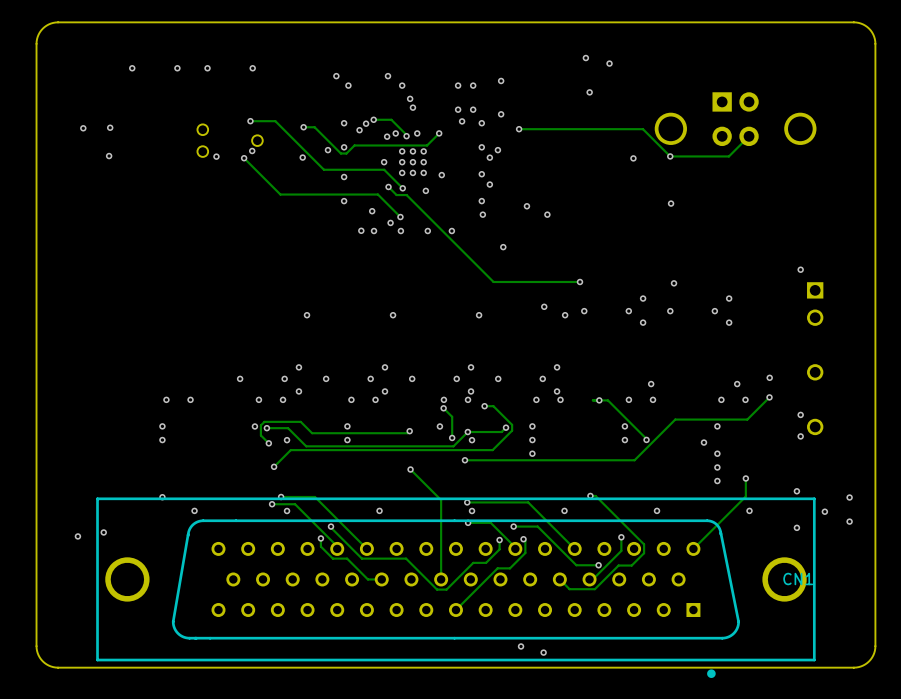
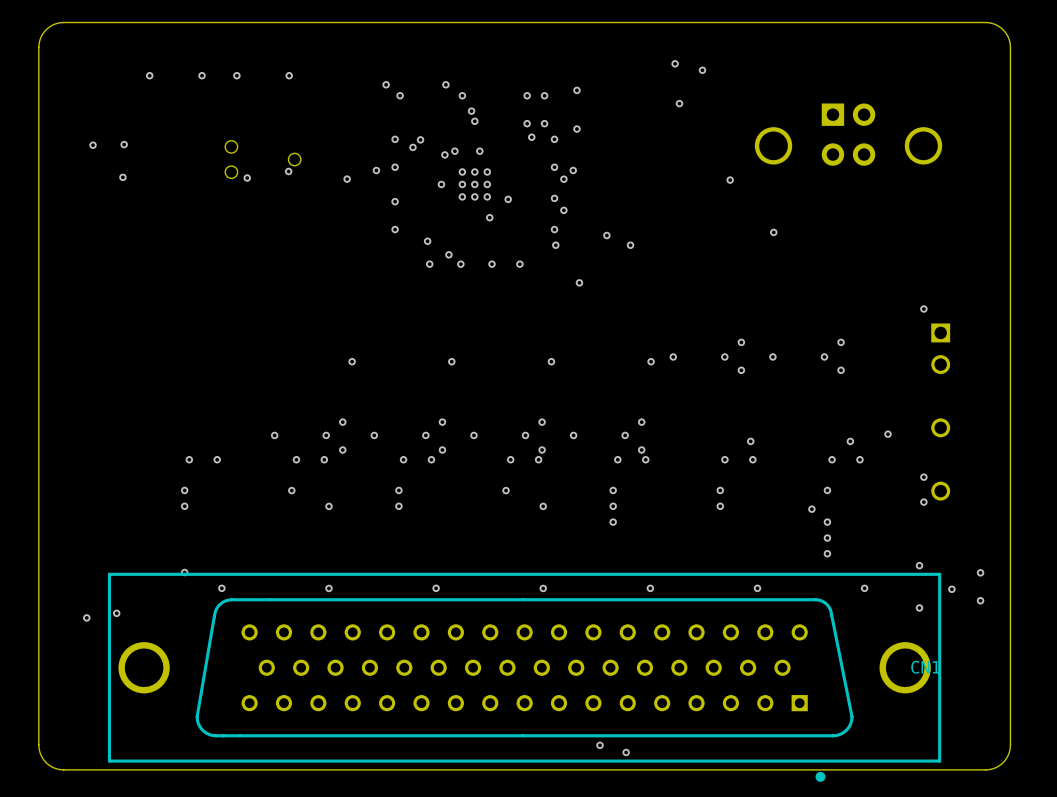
track: (373, 119) (391, 119) (406, 136) -> none
via: (373, 119) -> none
track: (250, 121) (275, 121) (323, 169) (384, 169) (402, 188) -> none
via: (250, 121) -> none
track: (303, 127) (314, 127) (340, 153) (346, 153) (354, 145) (427, 145) (439, 133) -> none
via: (303, 127) -> none
track: (519, 129) (643, 129) (670, 156) (728, 156) (749, 136) -> none
via: (519, 129) -> none
via: (439, 133) -> none
via: (406, 136) -> none
via: (670, 156) -> none
track: (244, 158) (280, 194) (377, 194) (400, 217) -> none
via: (244, 158) -> none
track: (388, 186) (396, 195) (406, 195) (493, 281) (579, 281) -> none
via: (388, 186) -> none
via: (402, 188) -> none
via: (400, 217) -> none
via: (361, 230) -> none
via: (579, 281) -> none
via: (674, 283) -> none
via: (544, 306) -> none
track: (769, 397) (747, 419) (675, 419) (634, 460) (464, 460) -> none
via: (769, 397) -> none
track: (592, 400) (607, 400) (646, 439) -> none
via: (599, 400) -> none
track: (484, 406) (493, 406) (512, 424) (512, 430) (492, 450) (290, 450) (274, 466) -> none
via: (484, 406) -> none
track: (443, 408) (452, 416) (452, 437) -> none
via: (443, 408) -> none
track: (506, 427) (501, 432) (467, 432) (453, 446) (306, 446) (288, 428) (266, 428) -> none
via: (506, 427) -> none
via: (266, 428) -> none
track: (409, 431) (407, 433) (312, 433) (300, 421) (264, 421) (260, 425) (260, 435) (268, 443) -> none
via: (409, 431) -> none
via: (467, 432) -> none
via: (452, 437) -> none
via: (646, 439) -> none
via: (268, 443) -> none
via: (464, 460) -> none
via: (274, 466) -> none
track: (410, 469) (441, 500) (441, 579) -> none
via: (410, 469) -> none
track: (745, 478) (745, 496) (693, 548) -> none
via: (745, 478) -> none
track: (590, 495) (595, 495) (644, 544) (644, 553) (631, 565) (618, 565) (594, 589) (569, 589) (559, 579) -> none
via: (590, 495) -> none
track: (281, 496) (314, 496) (366, 548) -> none
via: (281, 496) -> none
track: (467, 502) (528, 502) (574, 548) -> none
via: (467, 502) -> none
track: (272, 504) (295, 504) (337, 546) (337, 548) -> none
via: (272, 504) -> none
track: (468, 522) (490, 522) (515, 548) -> none
via: (468, 522) -> none
track: (331, 526) (361, 558) (406, 558) (437, 589) (446, 589) (473, 562) (486, 562) (499, 549) (499, 540) -> none
via: (331, 526) -> none
track: (513, 526) (537, 526) (576, 565) (598, 565) -> none
via: (513, 526) -> none
track: (621, 537) (621, 550) (592, 579) (589, 579) -> none
via: (621, 537) -> none
track: (320, 538) (320, 546) (332, 558) (347, 558) (367, 579) (381, 579) -> none
via: (320, 538) -> none
track: (523, 539) (525, 541) (525, 553) (510, 568) (497, 568) (455, 610) -> none
via: (523, 539) -> none
via: (499, 540) -> none
via: (598, 565) -> none

